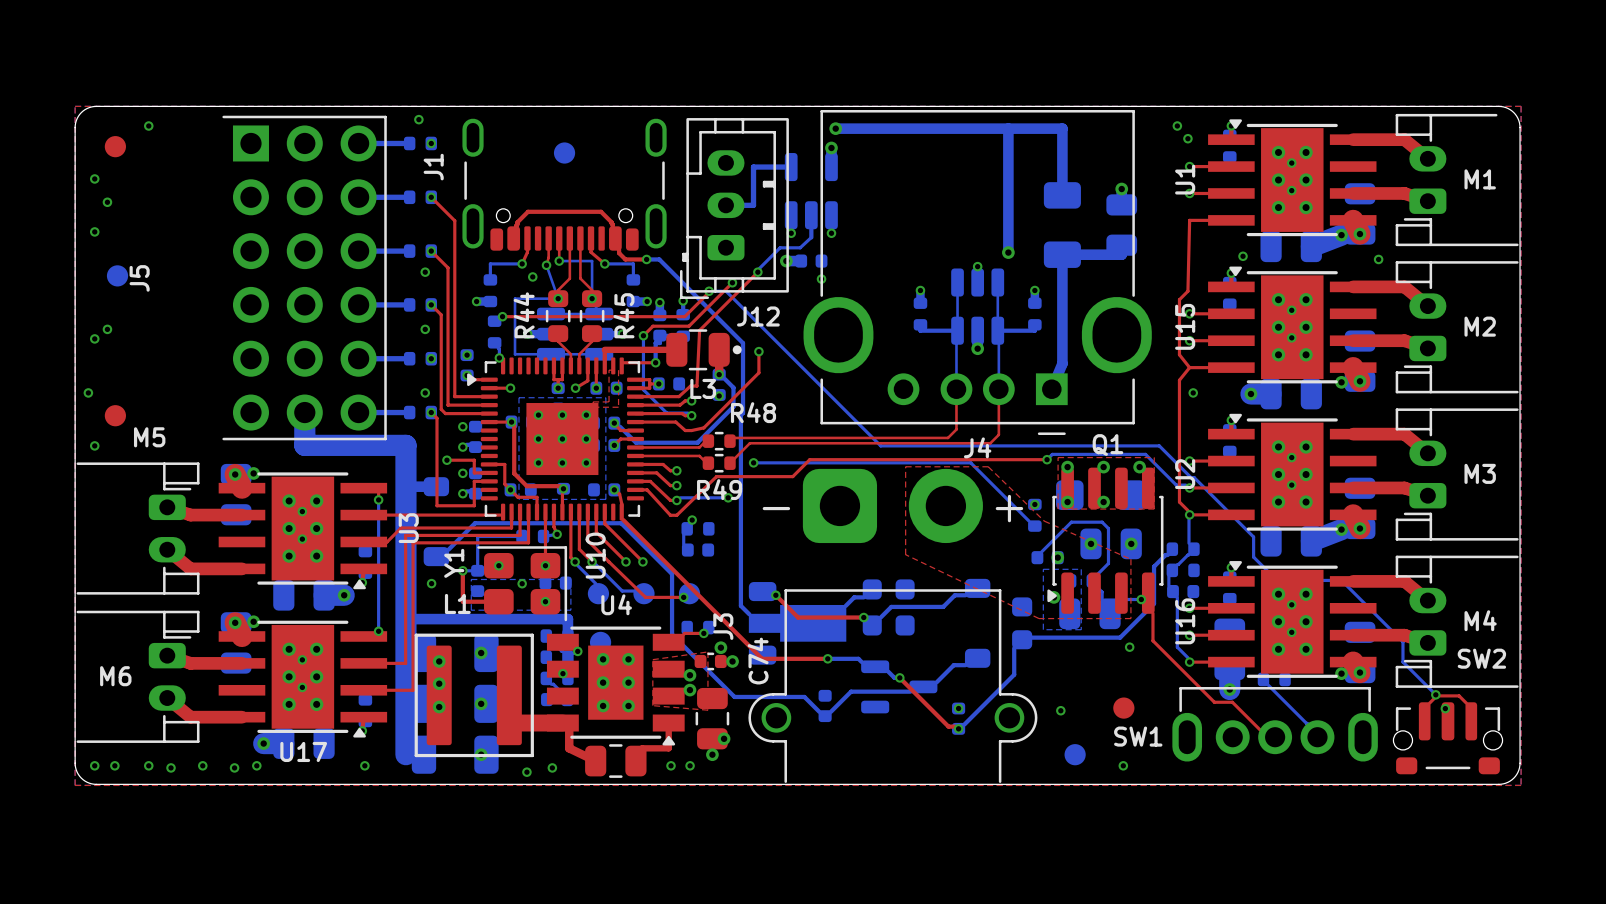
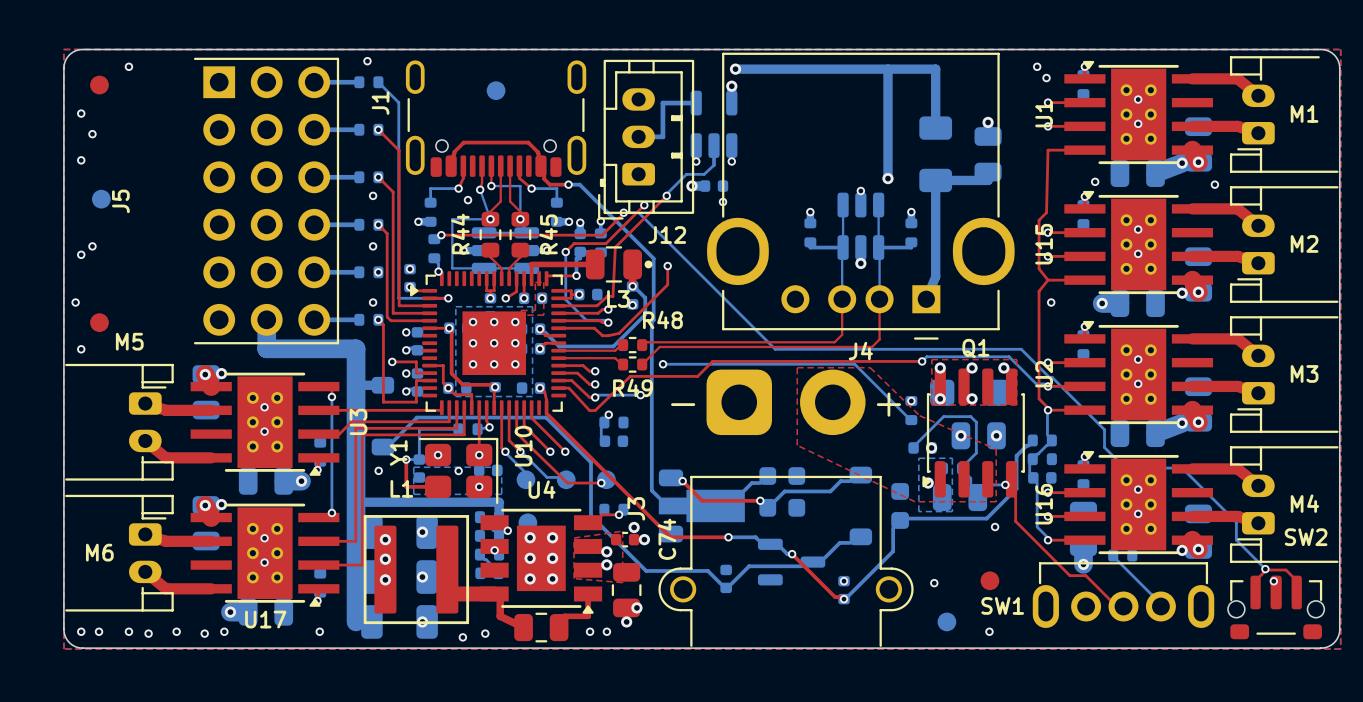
bottom track: none -> (378, 82) (398, 102) (398, 298) (448, 298)
via: (431, 143) -> none

